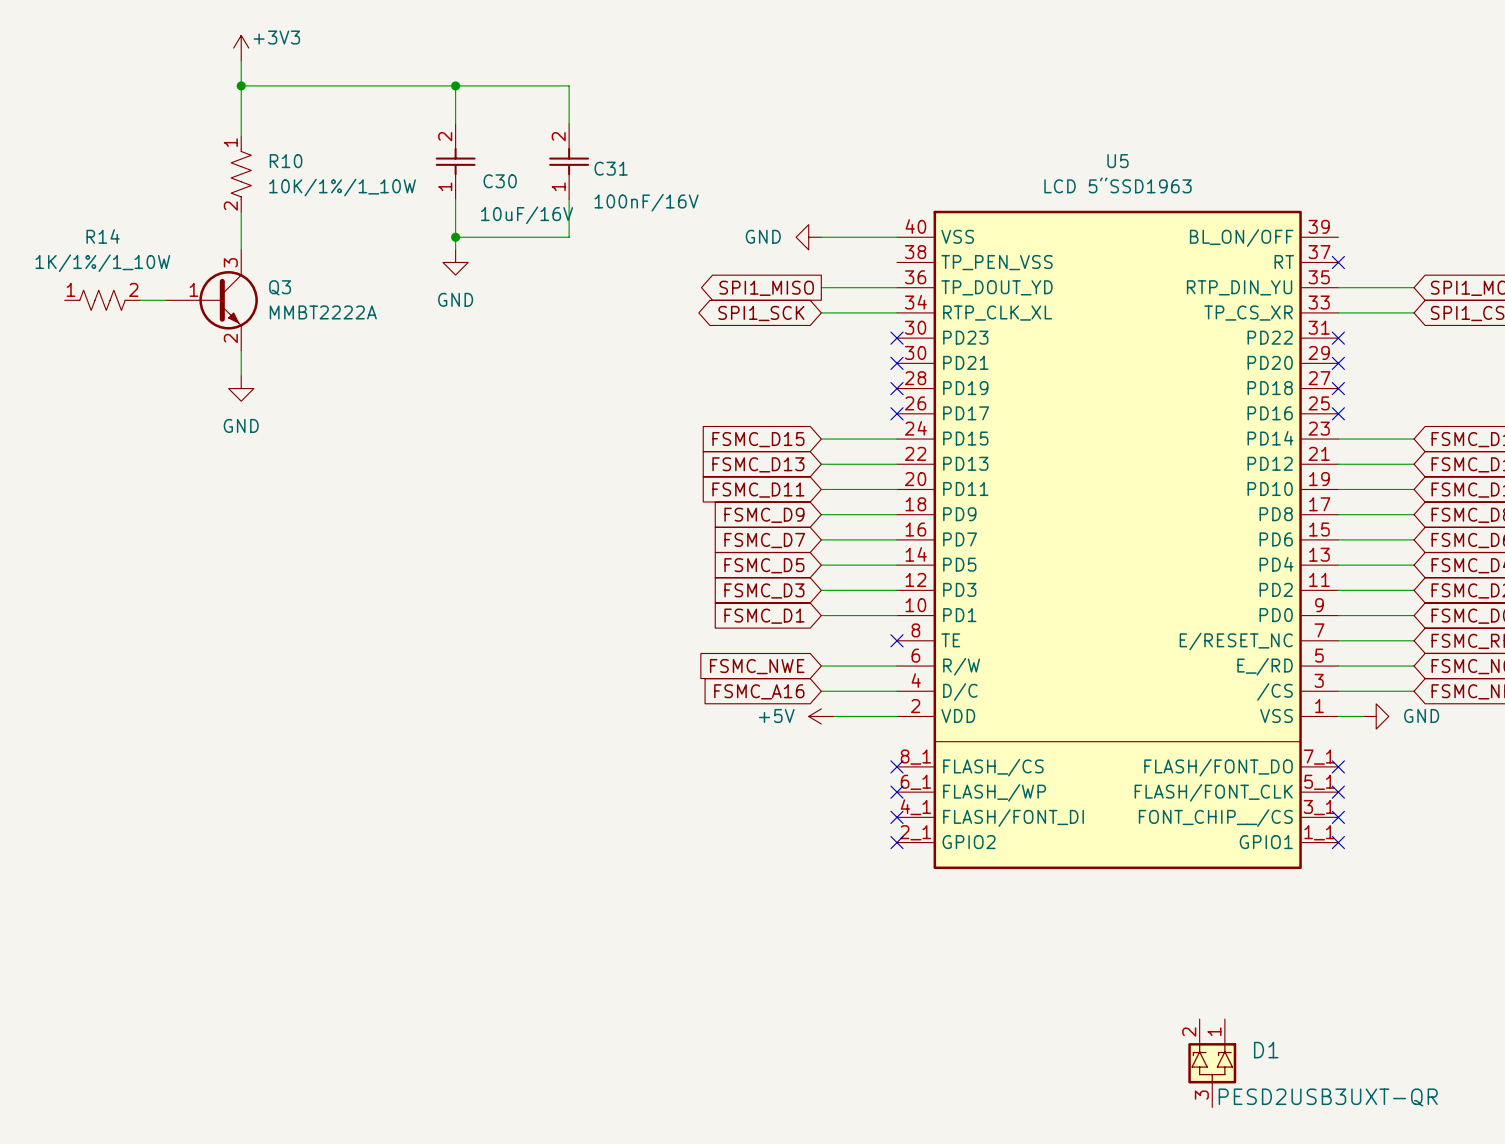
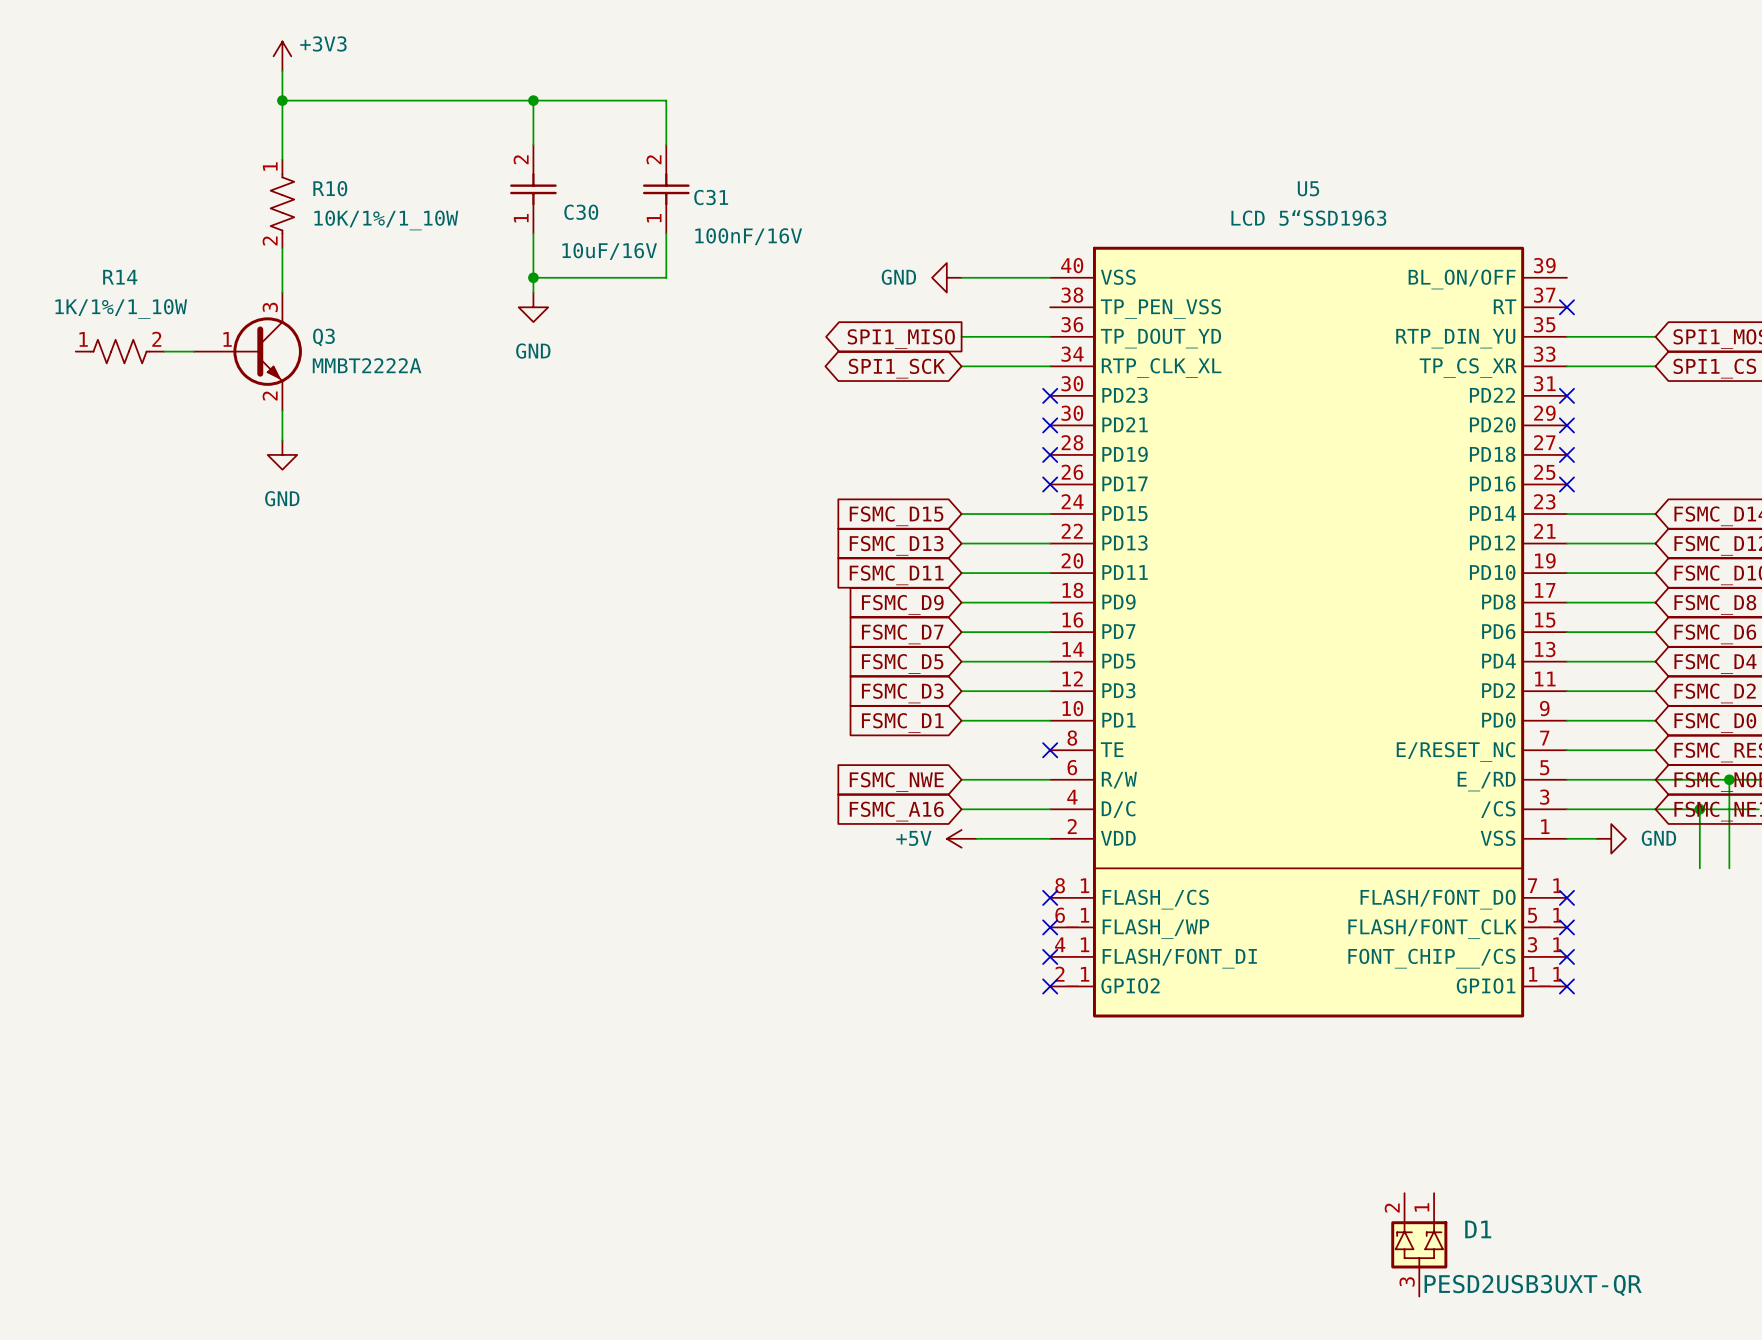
wire: none -> (1655, 779) (1758, 779)
wire: none -> (1729, 779) (1729, 868)
junction: none -> (1729, 779)
wire: none -> (1655, 809) (1758, 809)
wire: none -> (1699, 809) (1699, 868)
junction: none -> (1699, 809)

